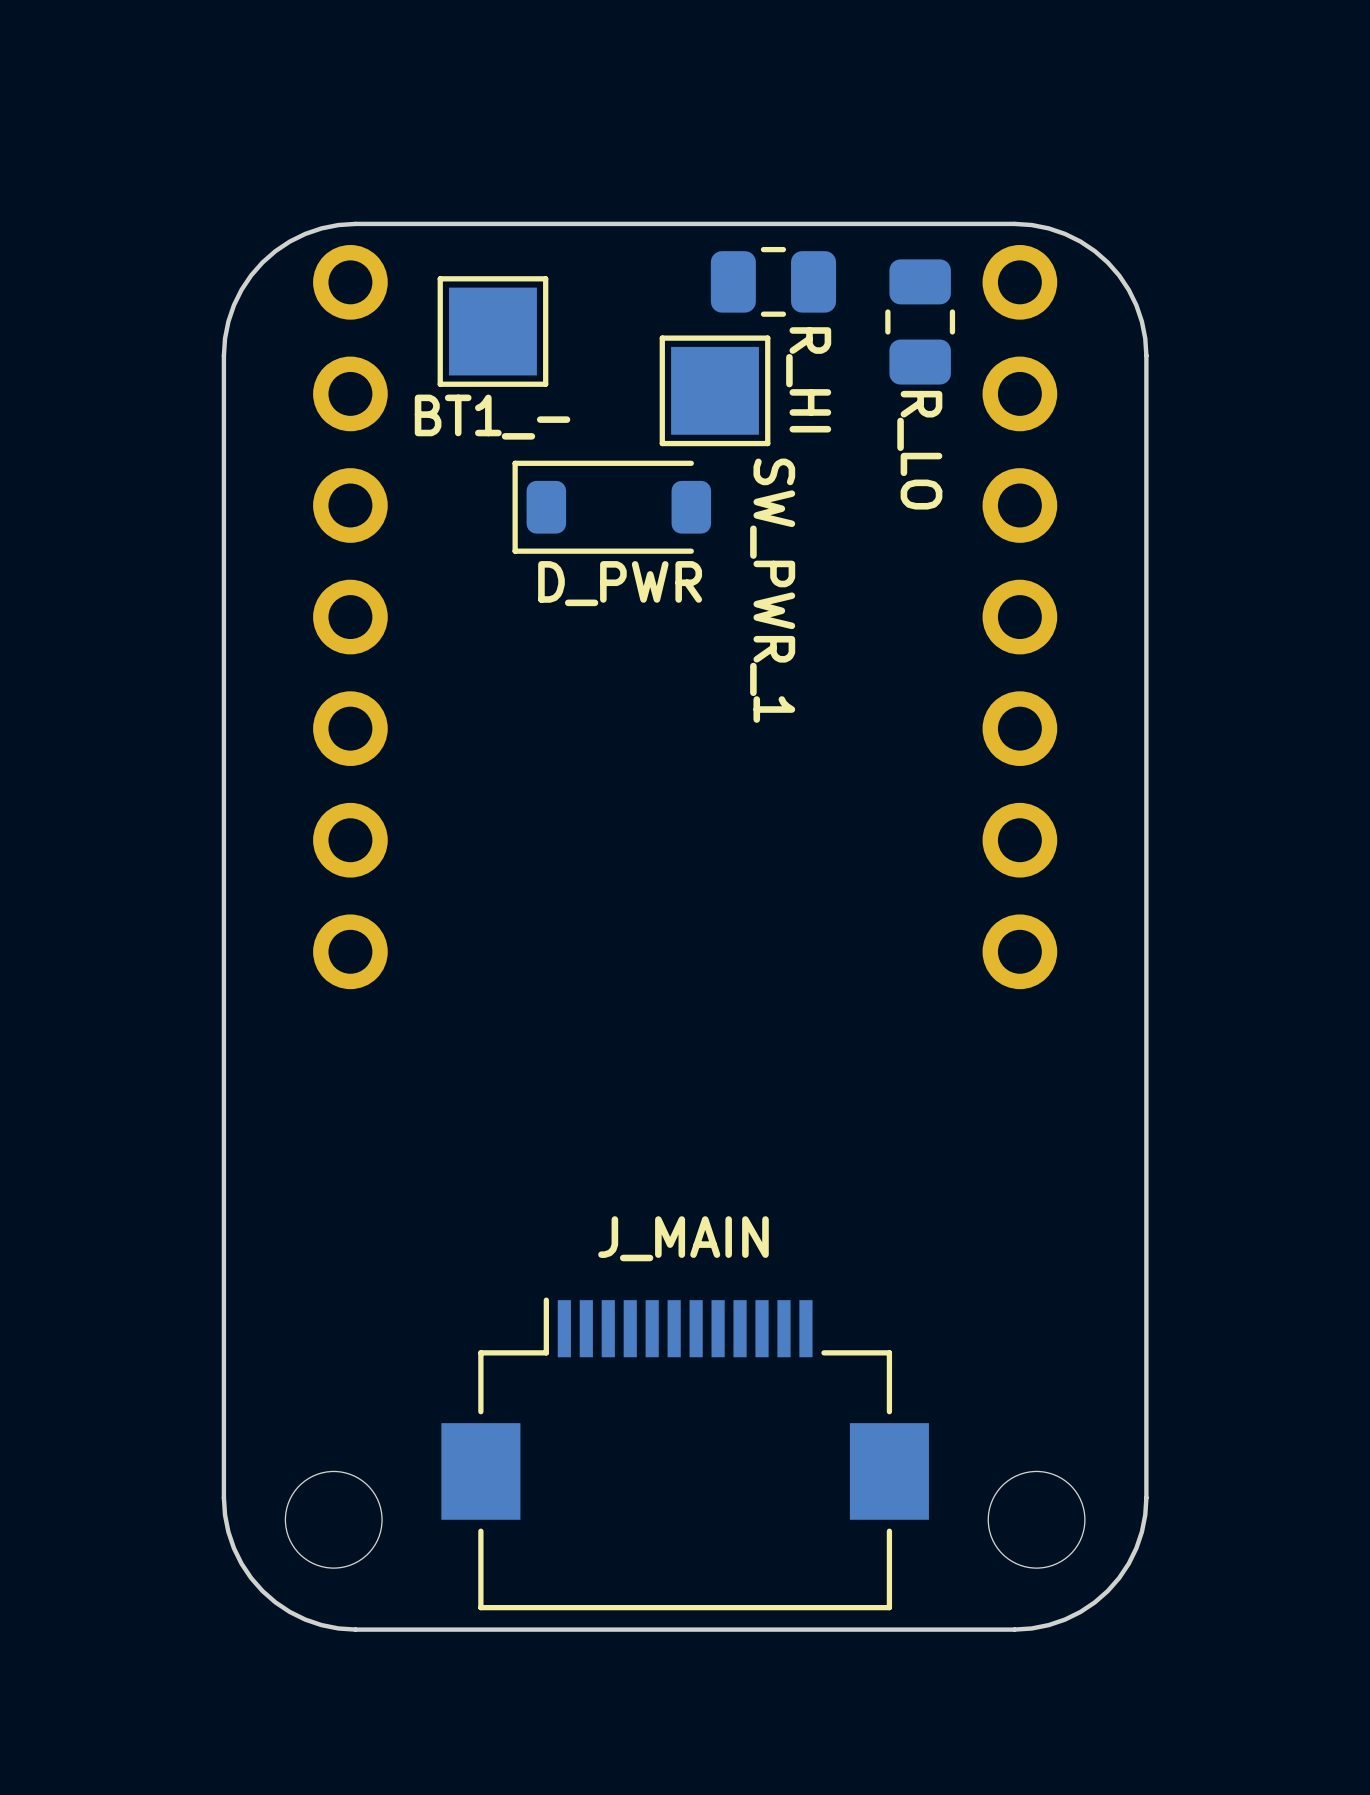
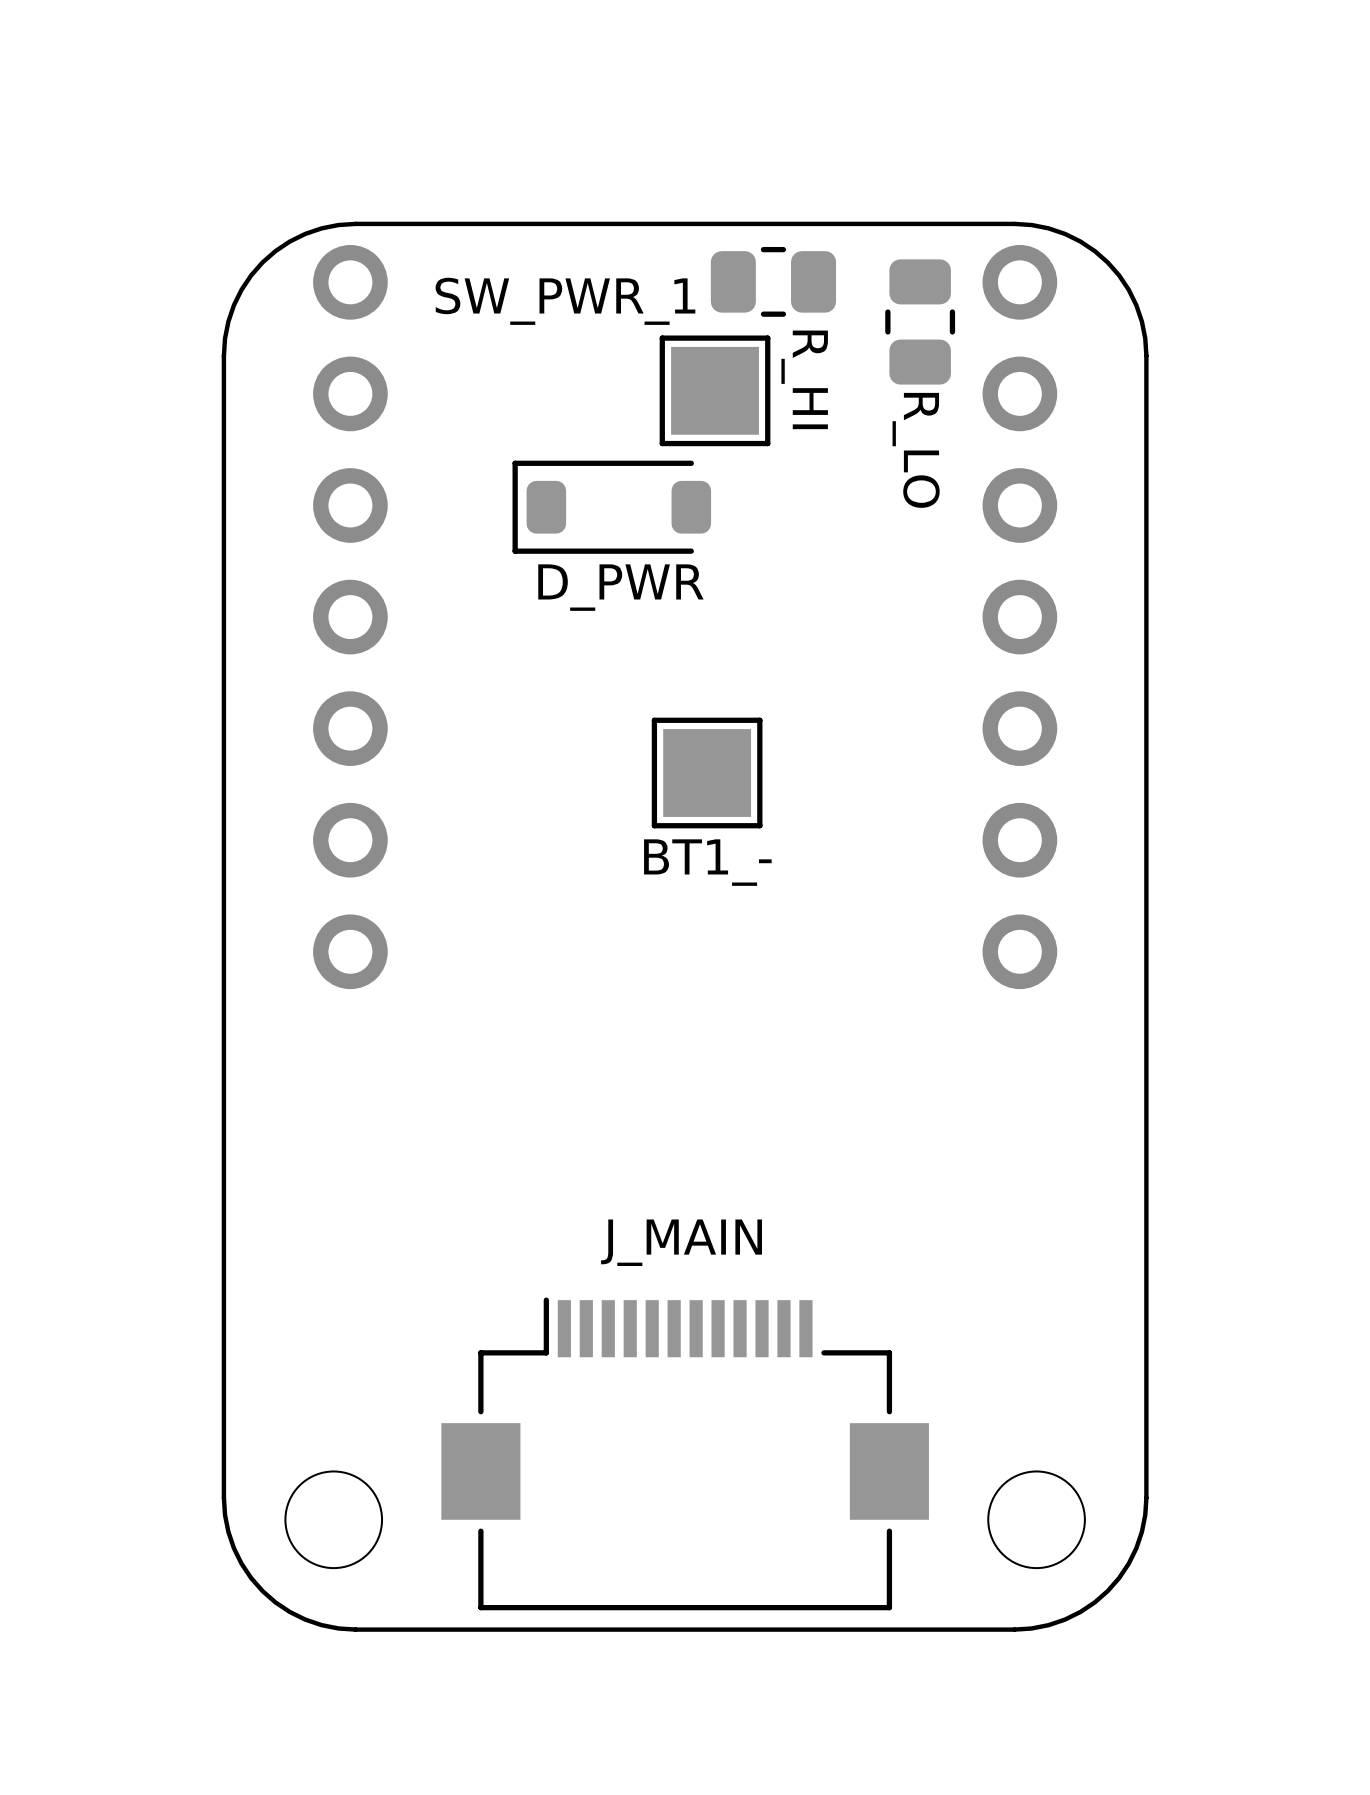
BT1_- position: (492, 331) -> (707, 773)
SW_PWR_1 name rotation: 0° (772, 590) -> 90° counterclockwise (565, 301)
SW_PWR_1 name position: SW_PWR_1 (772, 590) -> SW_PWR_1 (565, 301)

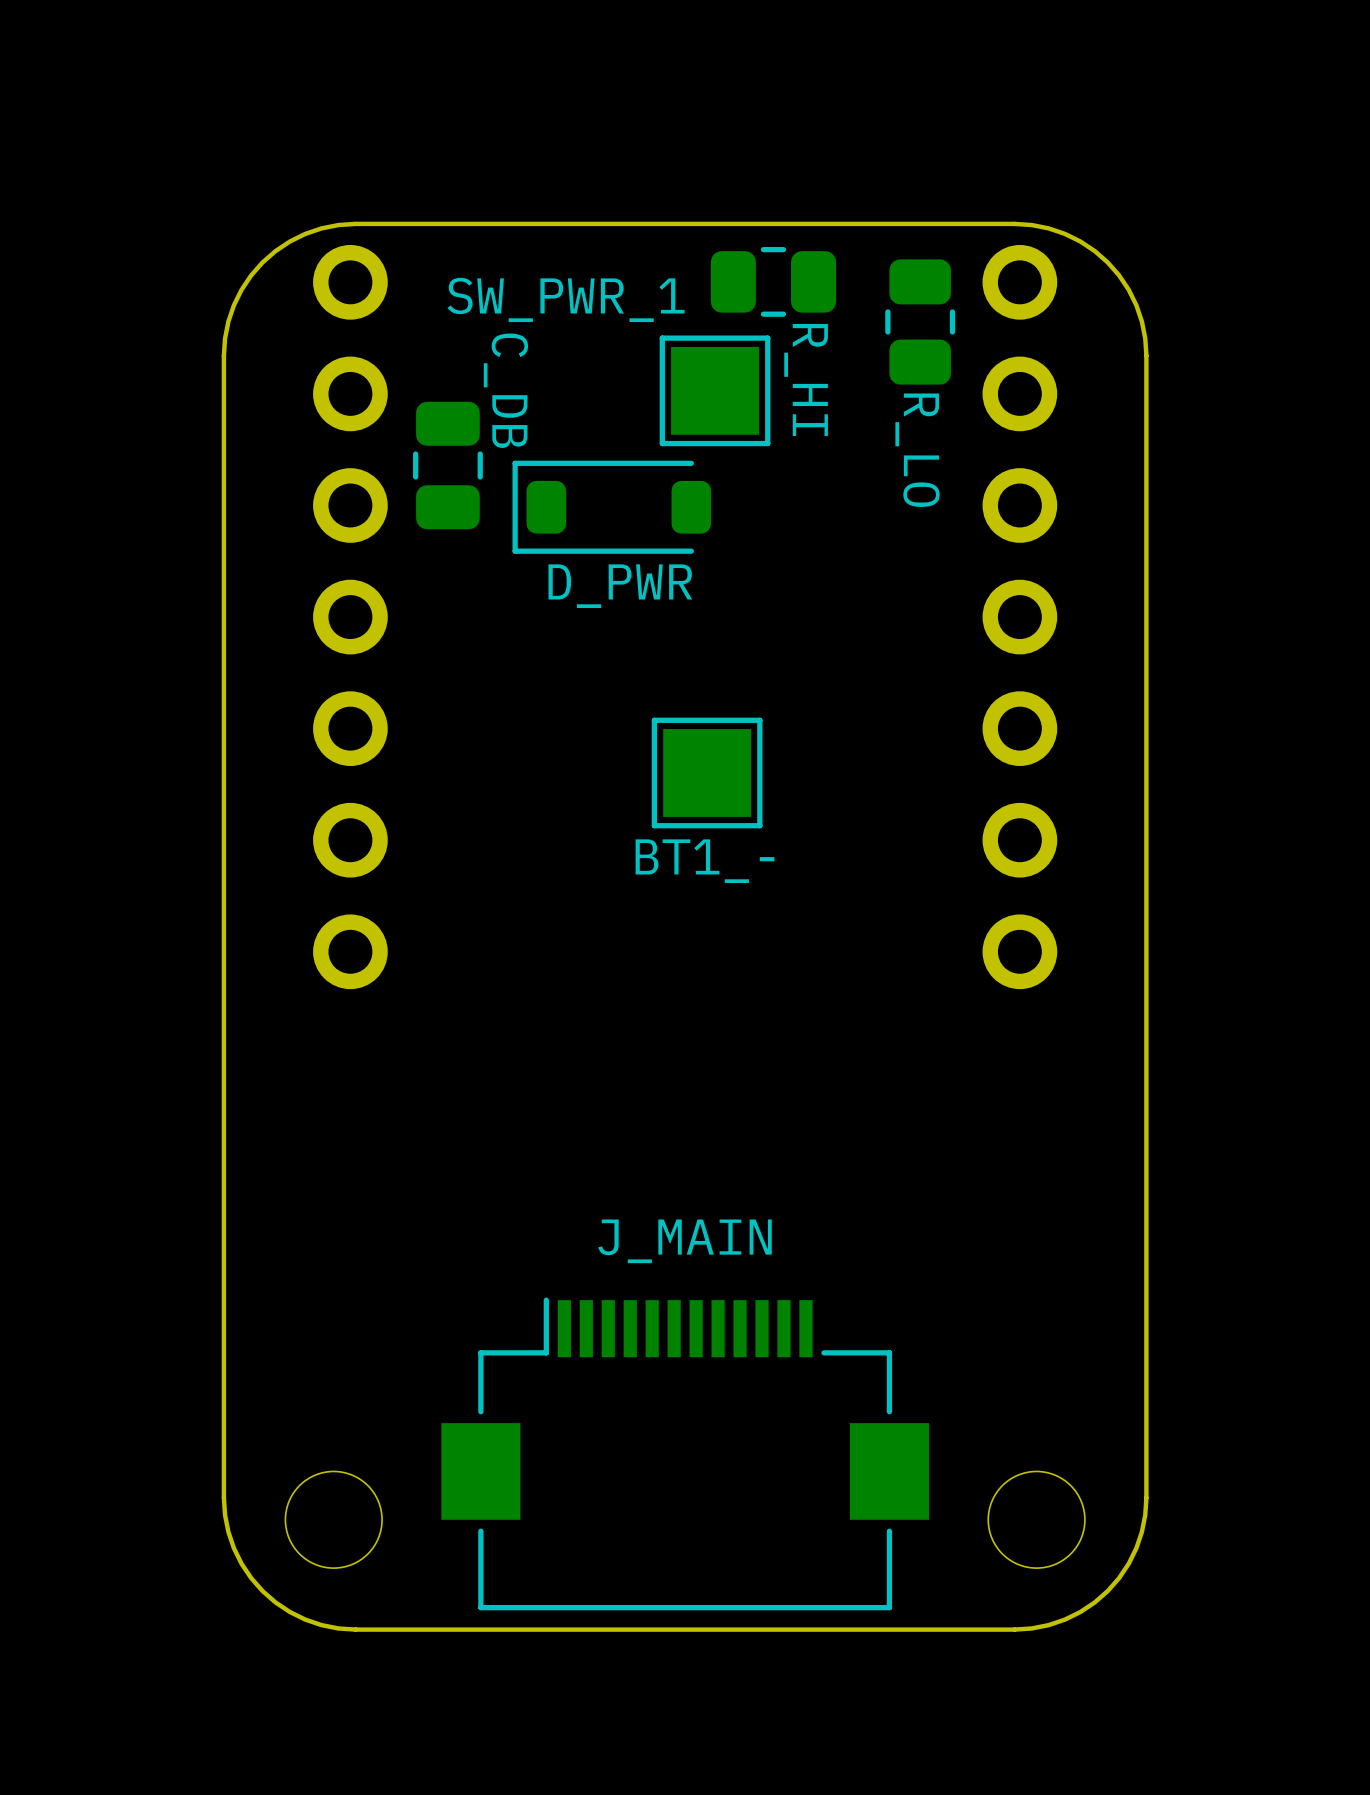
C_DB: none -> (447, 465)

